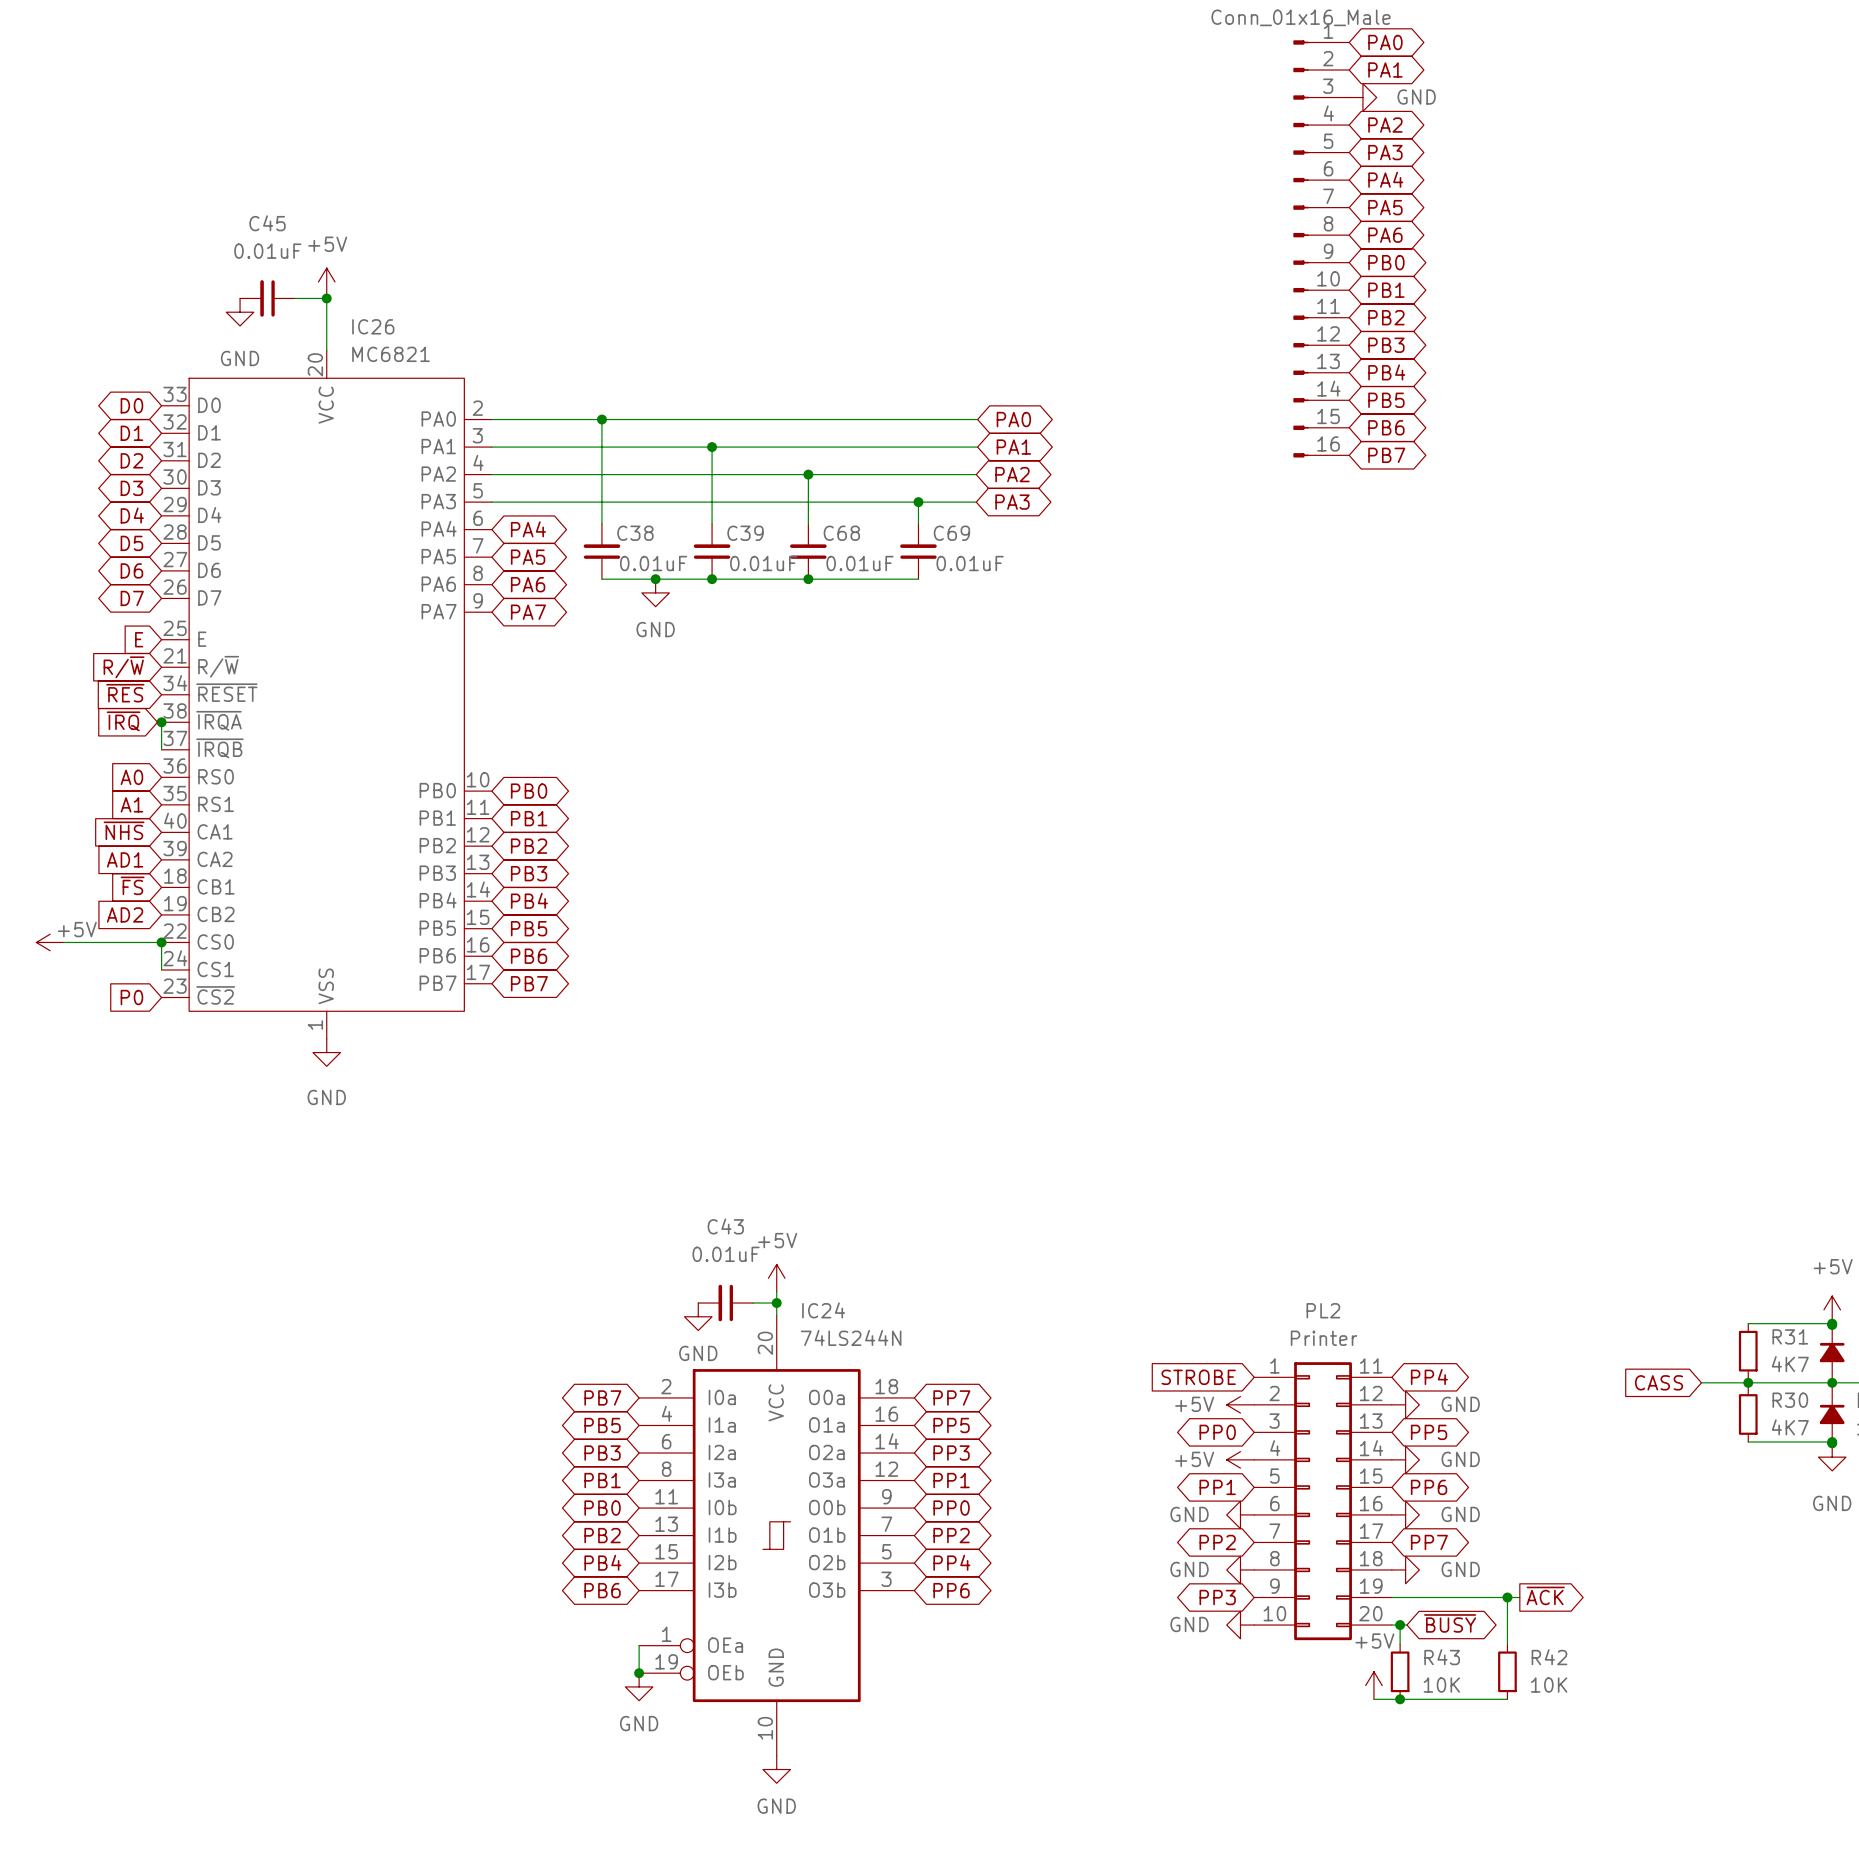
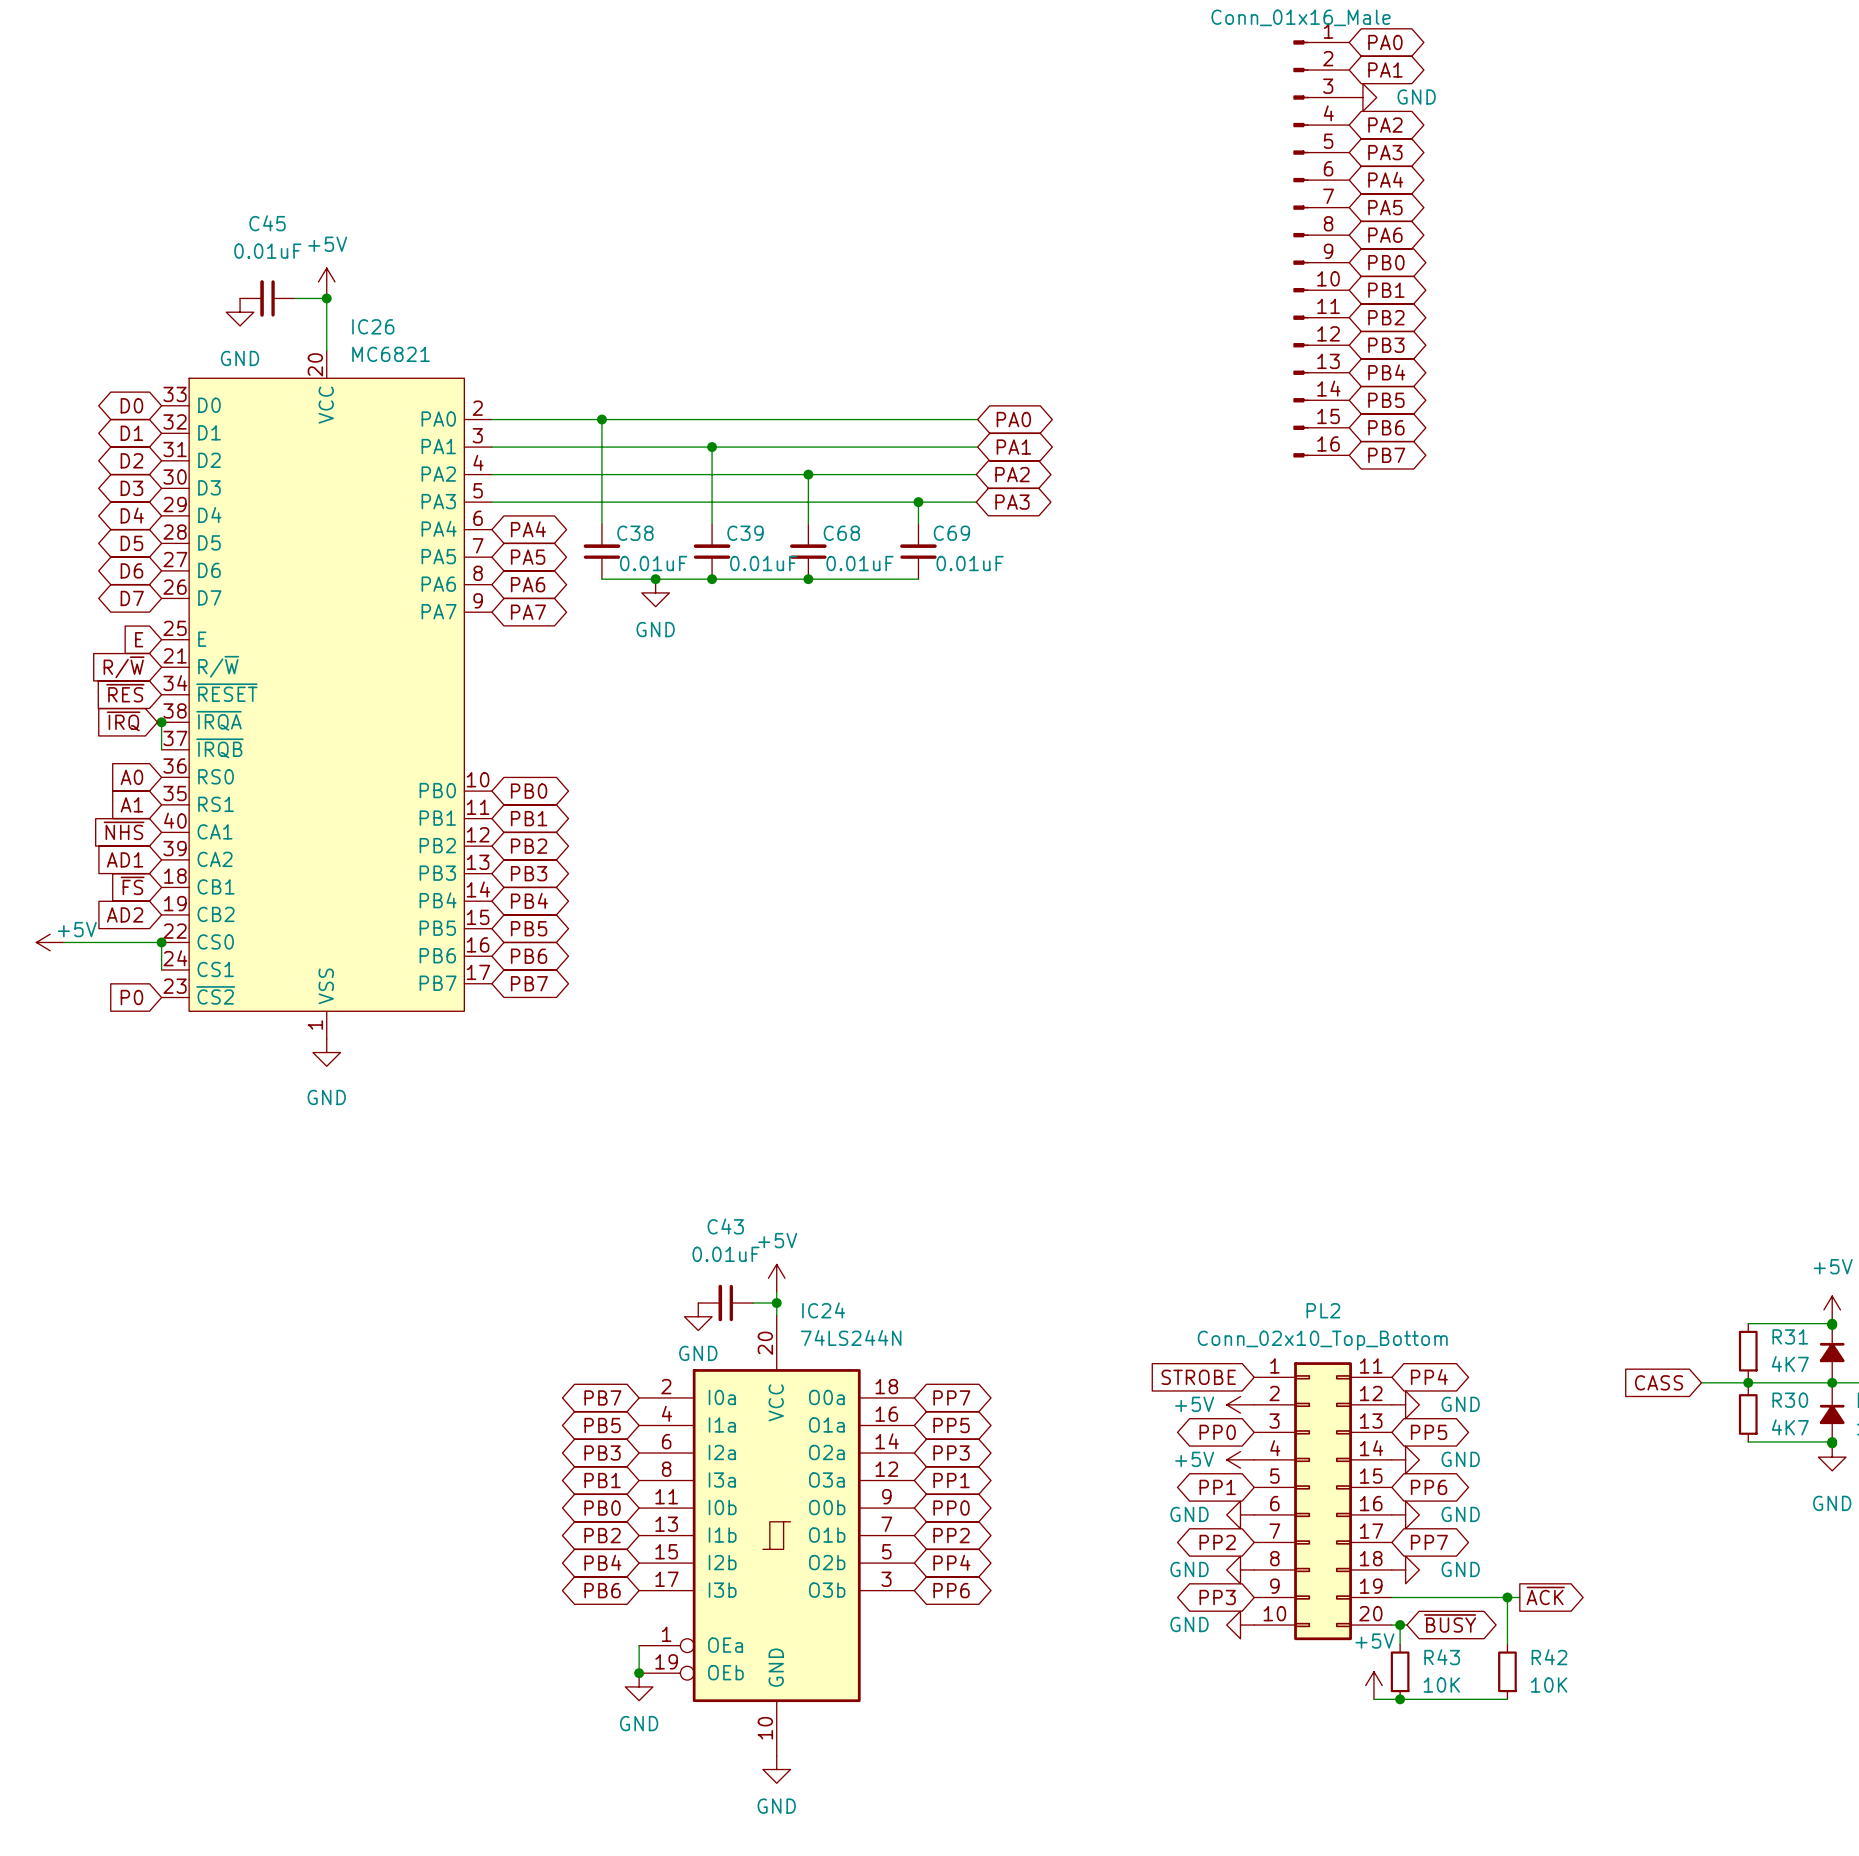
PL2 value: Printer (1324, 1338) -> Conn_02x10_Top_Bottom (1322, 1340)

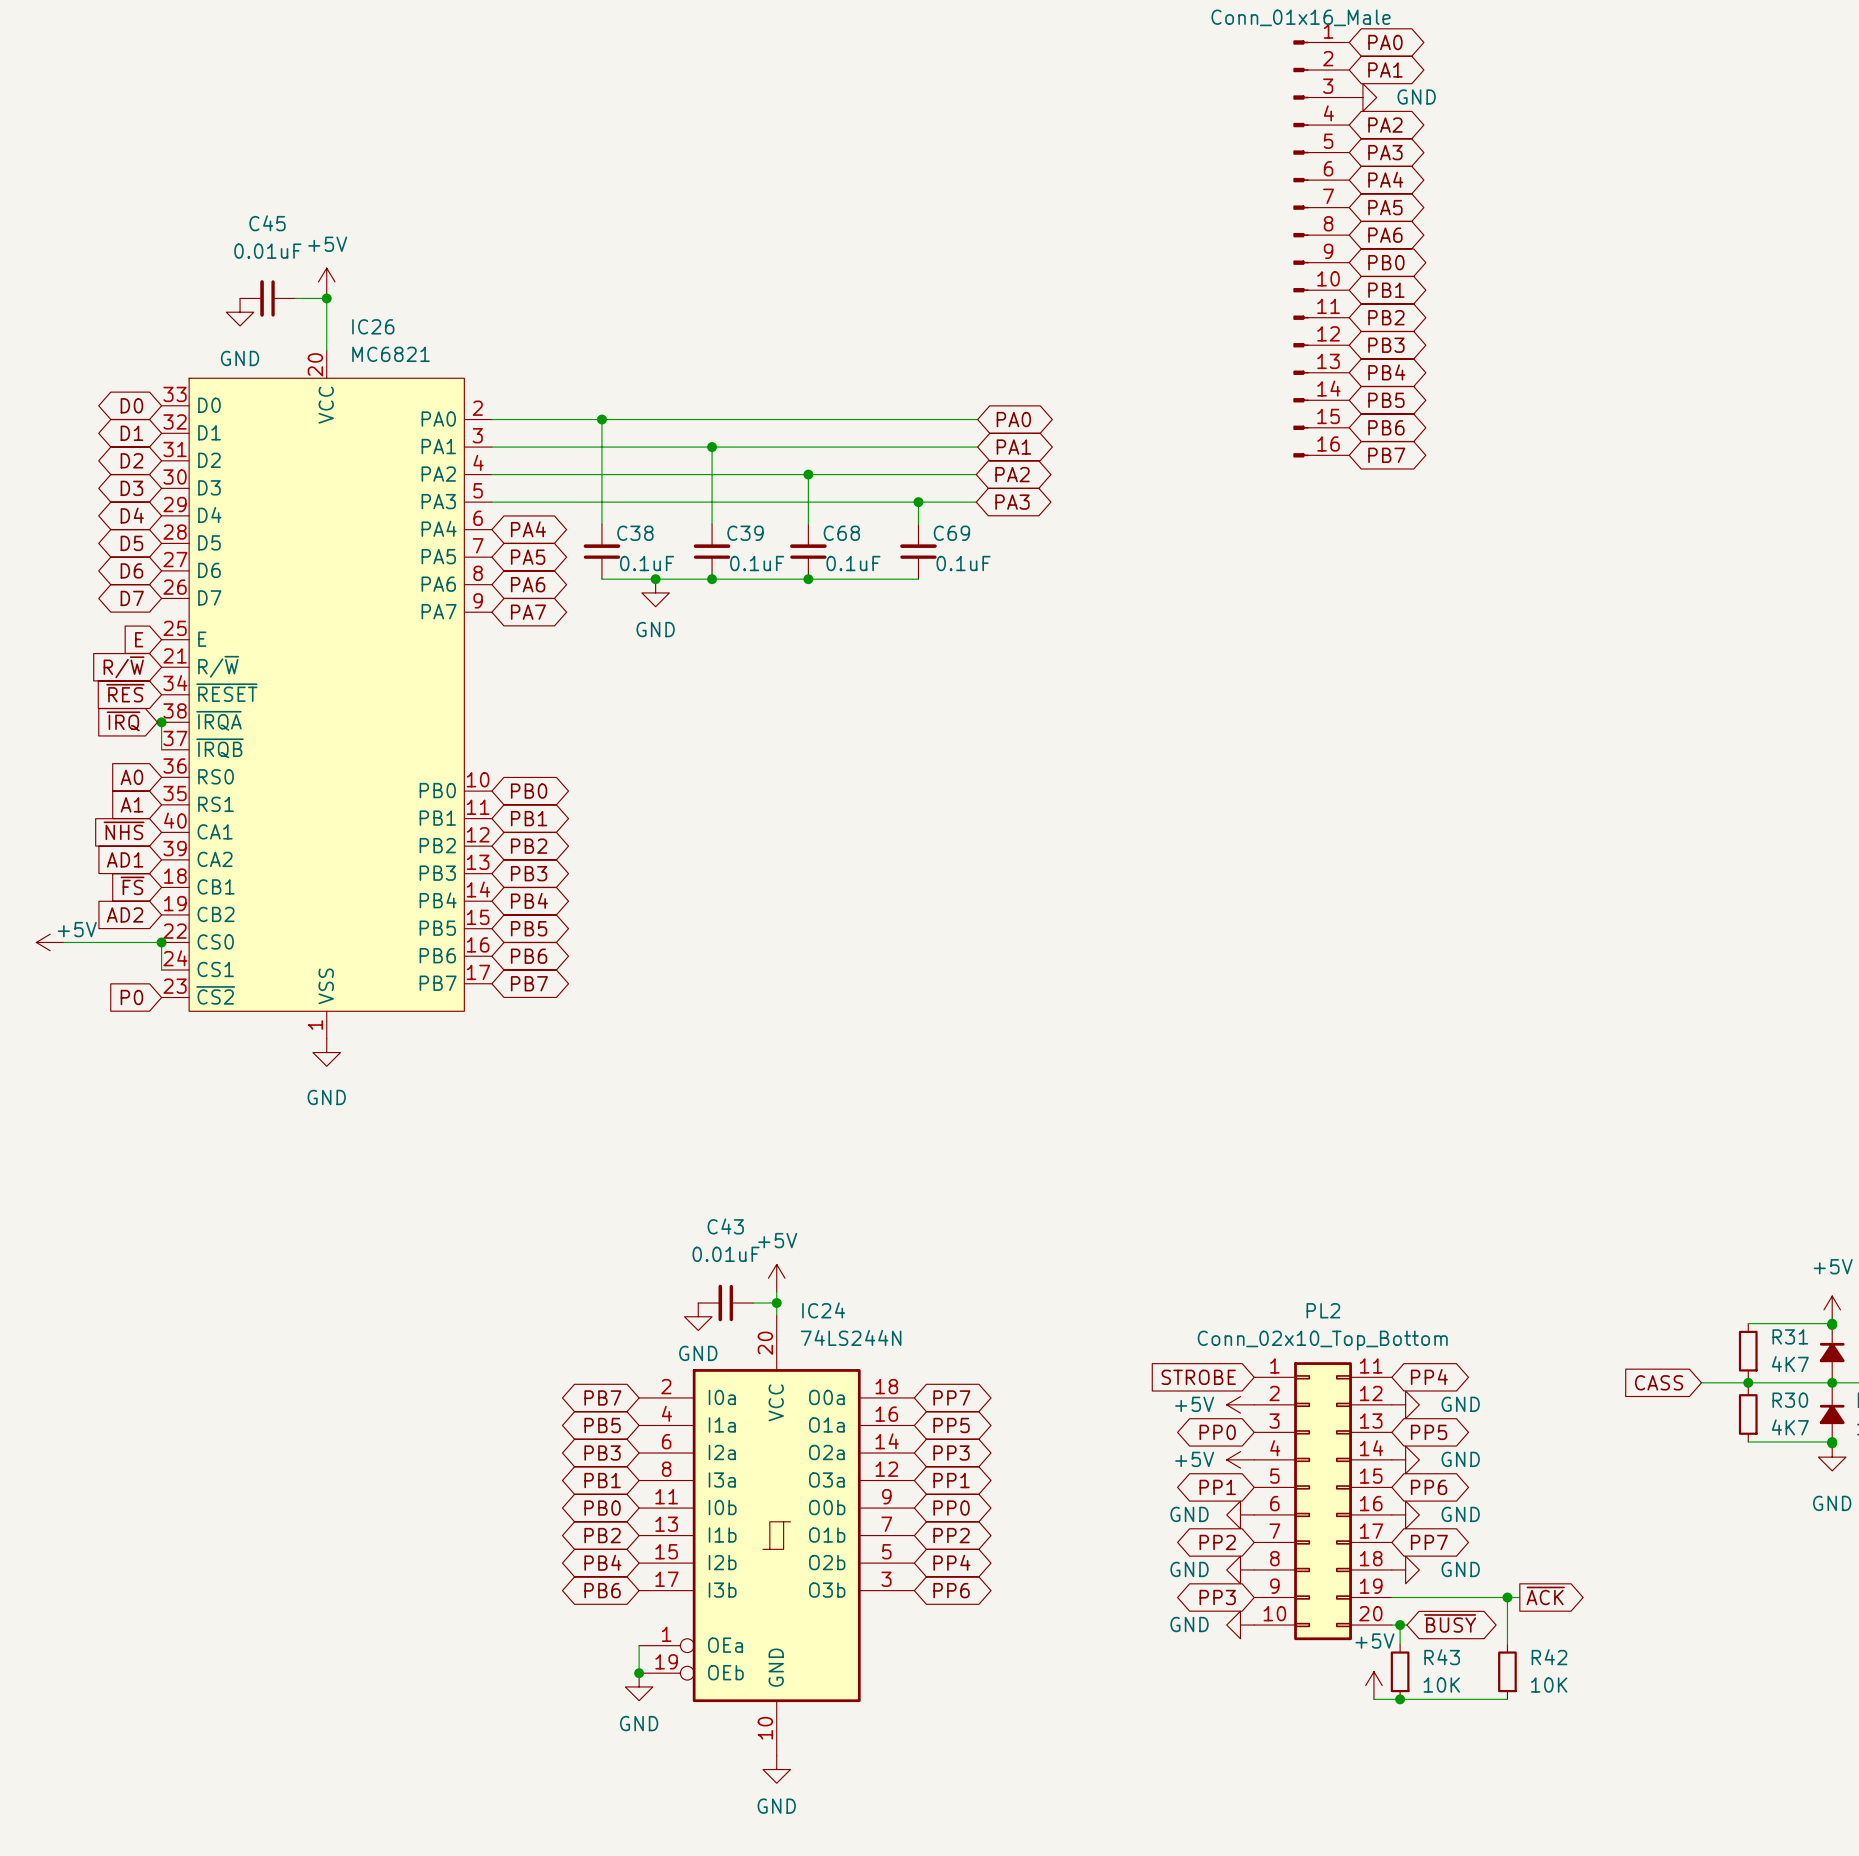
C38 value: 0.01uF (653, 563) -> 0.1uF (647, 563)
C39 value: 0.01uF (763, 563) -> 0.1uF (757, 563)
C68 value: 0.01uF (859, 563) -> 0.1uF (853, 563)
C69 value: 0.01uF (970, 563) -> 0.1uF (963, 563)

